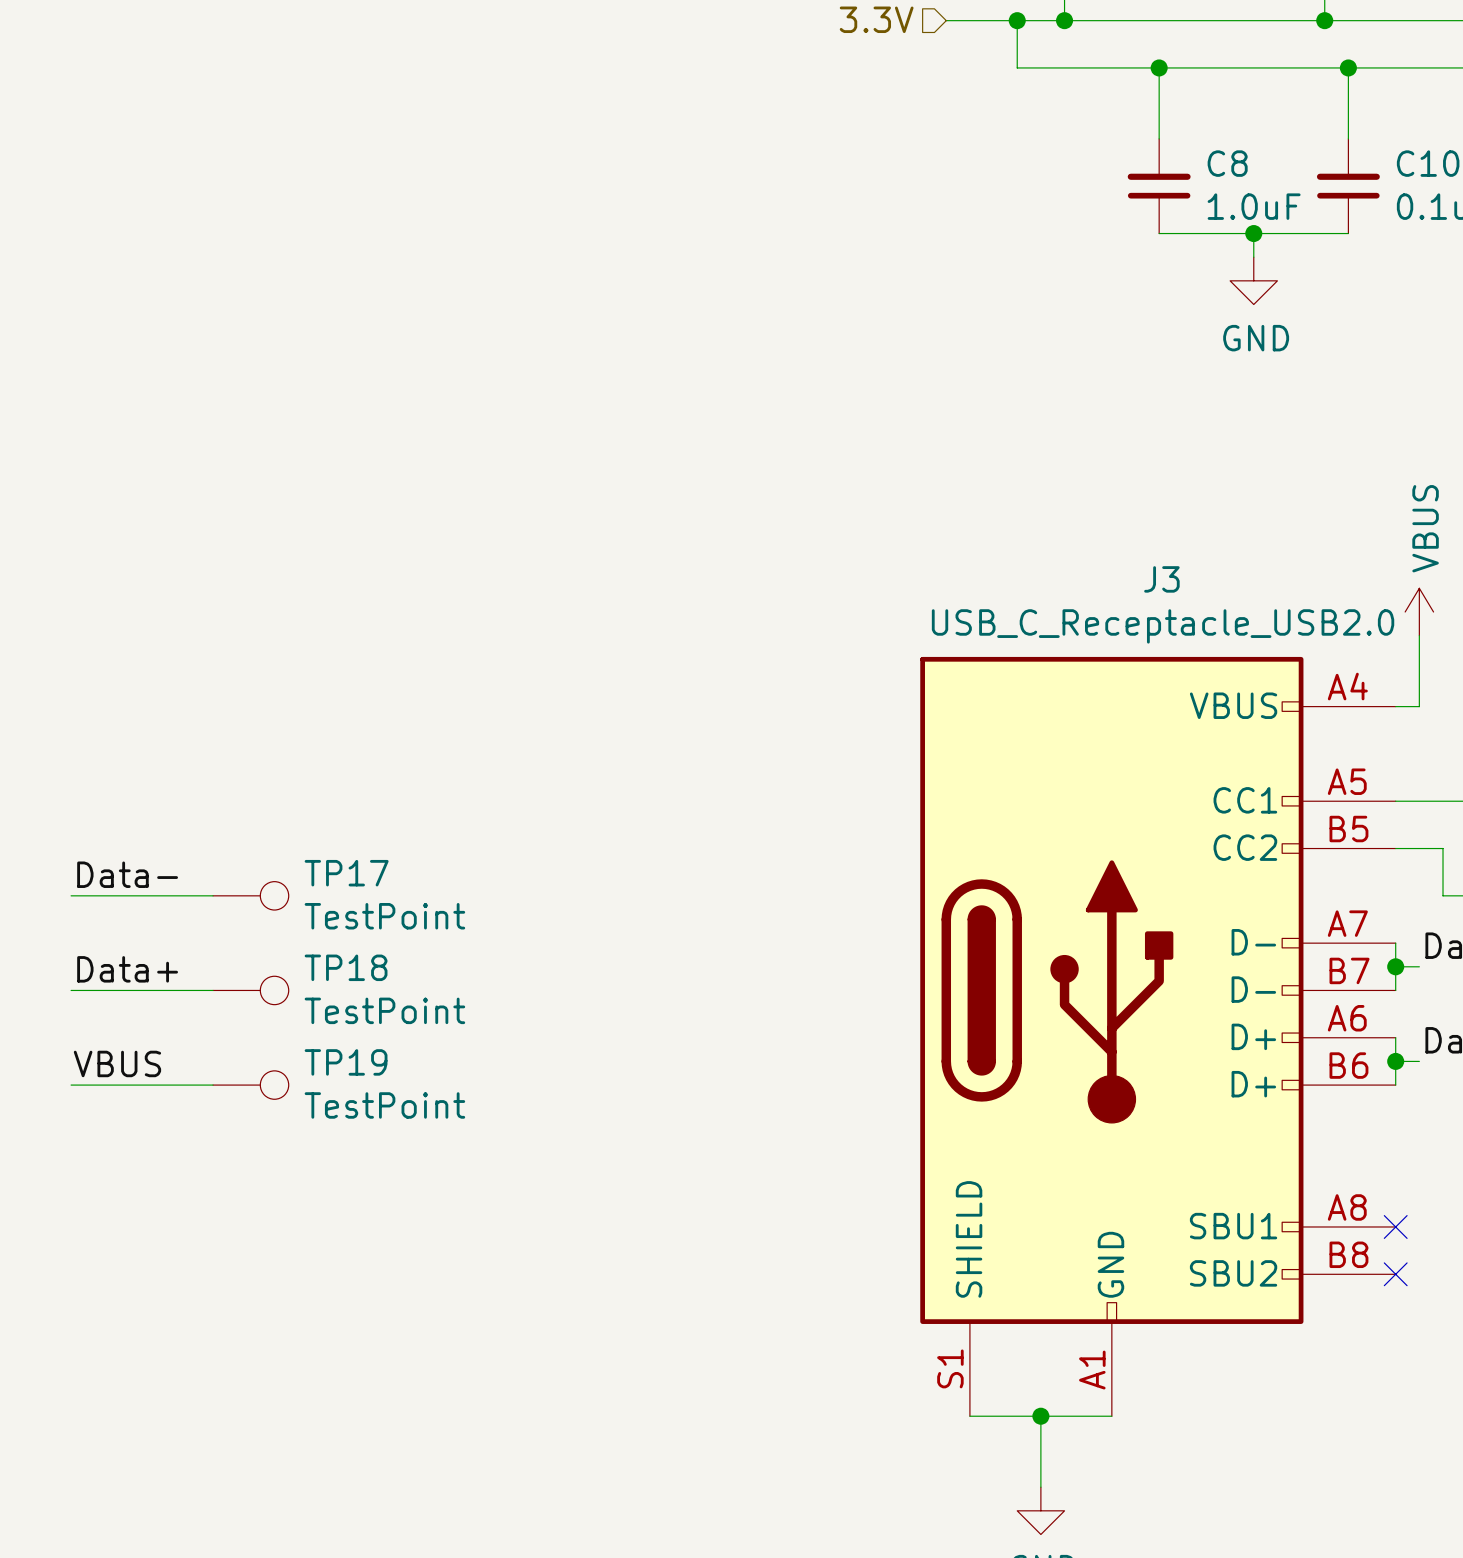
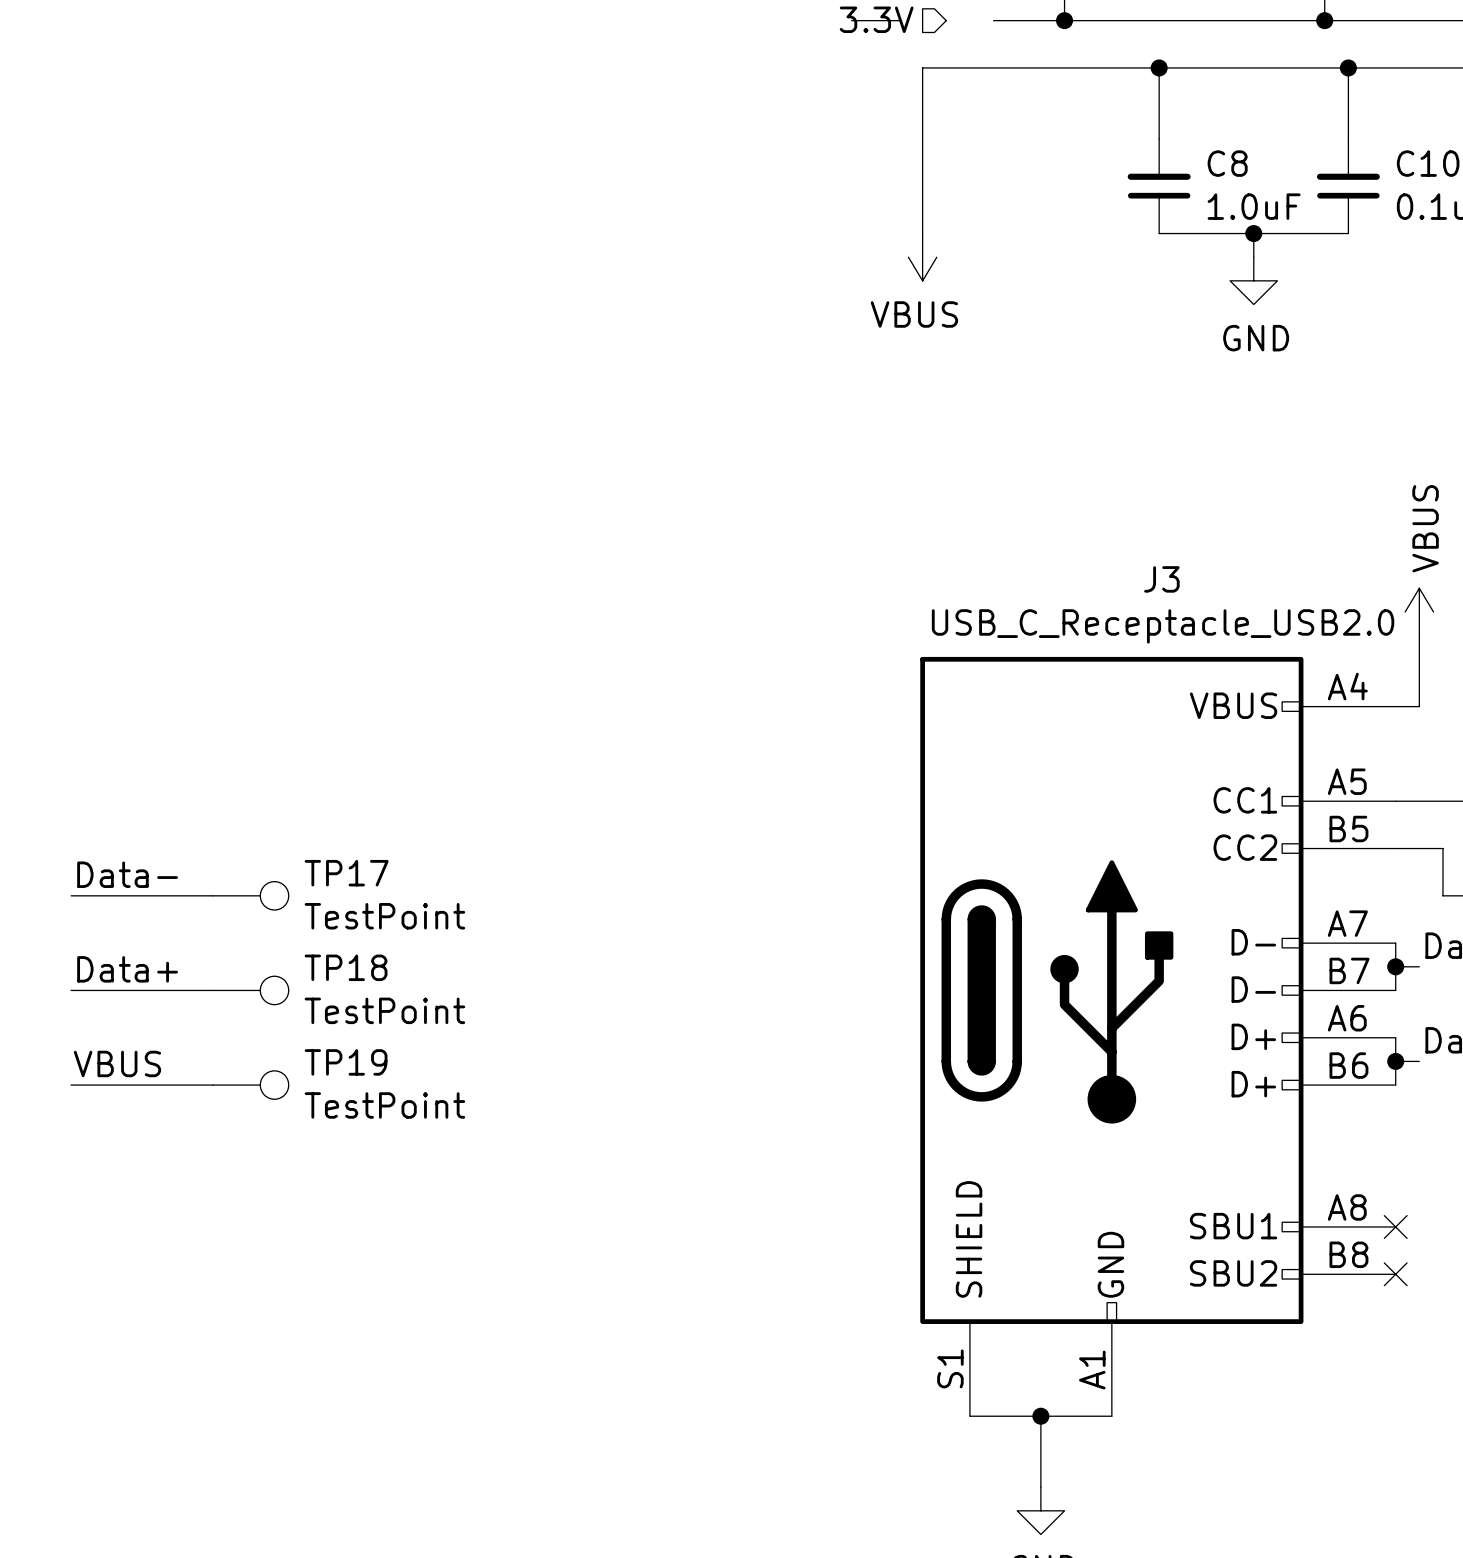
wire: (946, 20) (993, 20) -> (851, 20) (898, 20)
wire: (1017, 20) (1017, 67) -> (922, 233) (922, 67) (1017, 67)
junction: (1017, 20) -> none
power symbol: none -> VBUS (922, 257)

